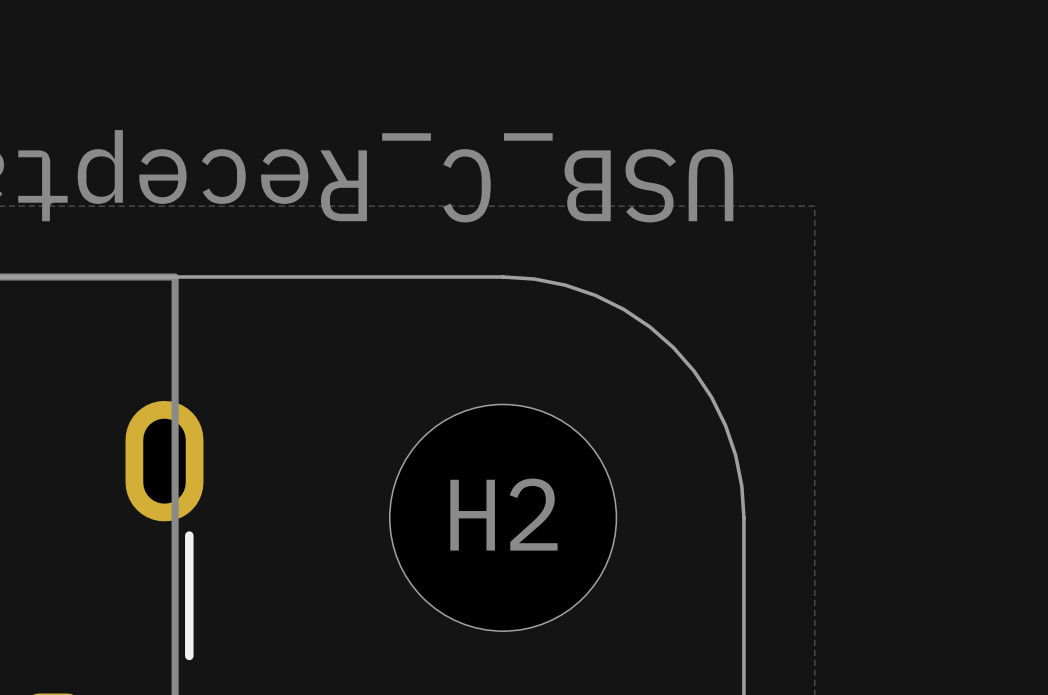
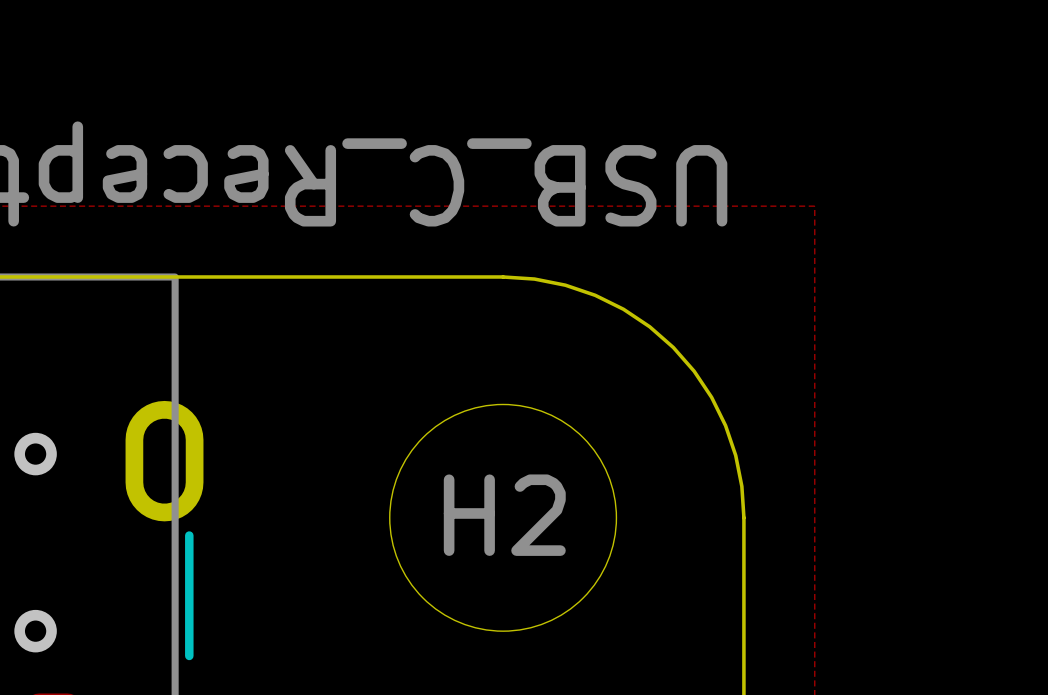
via: none -> (35, 454)
via: none -> (35, 631)

